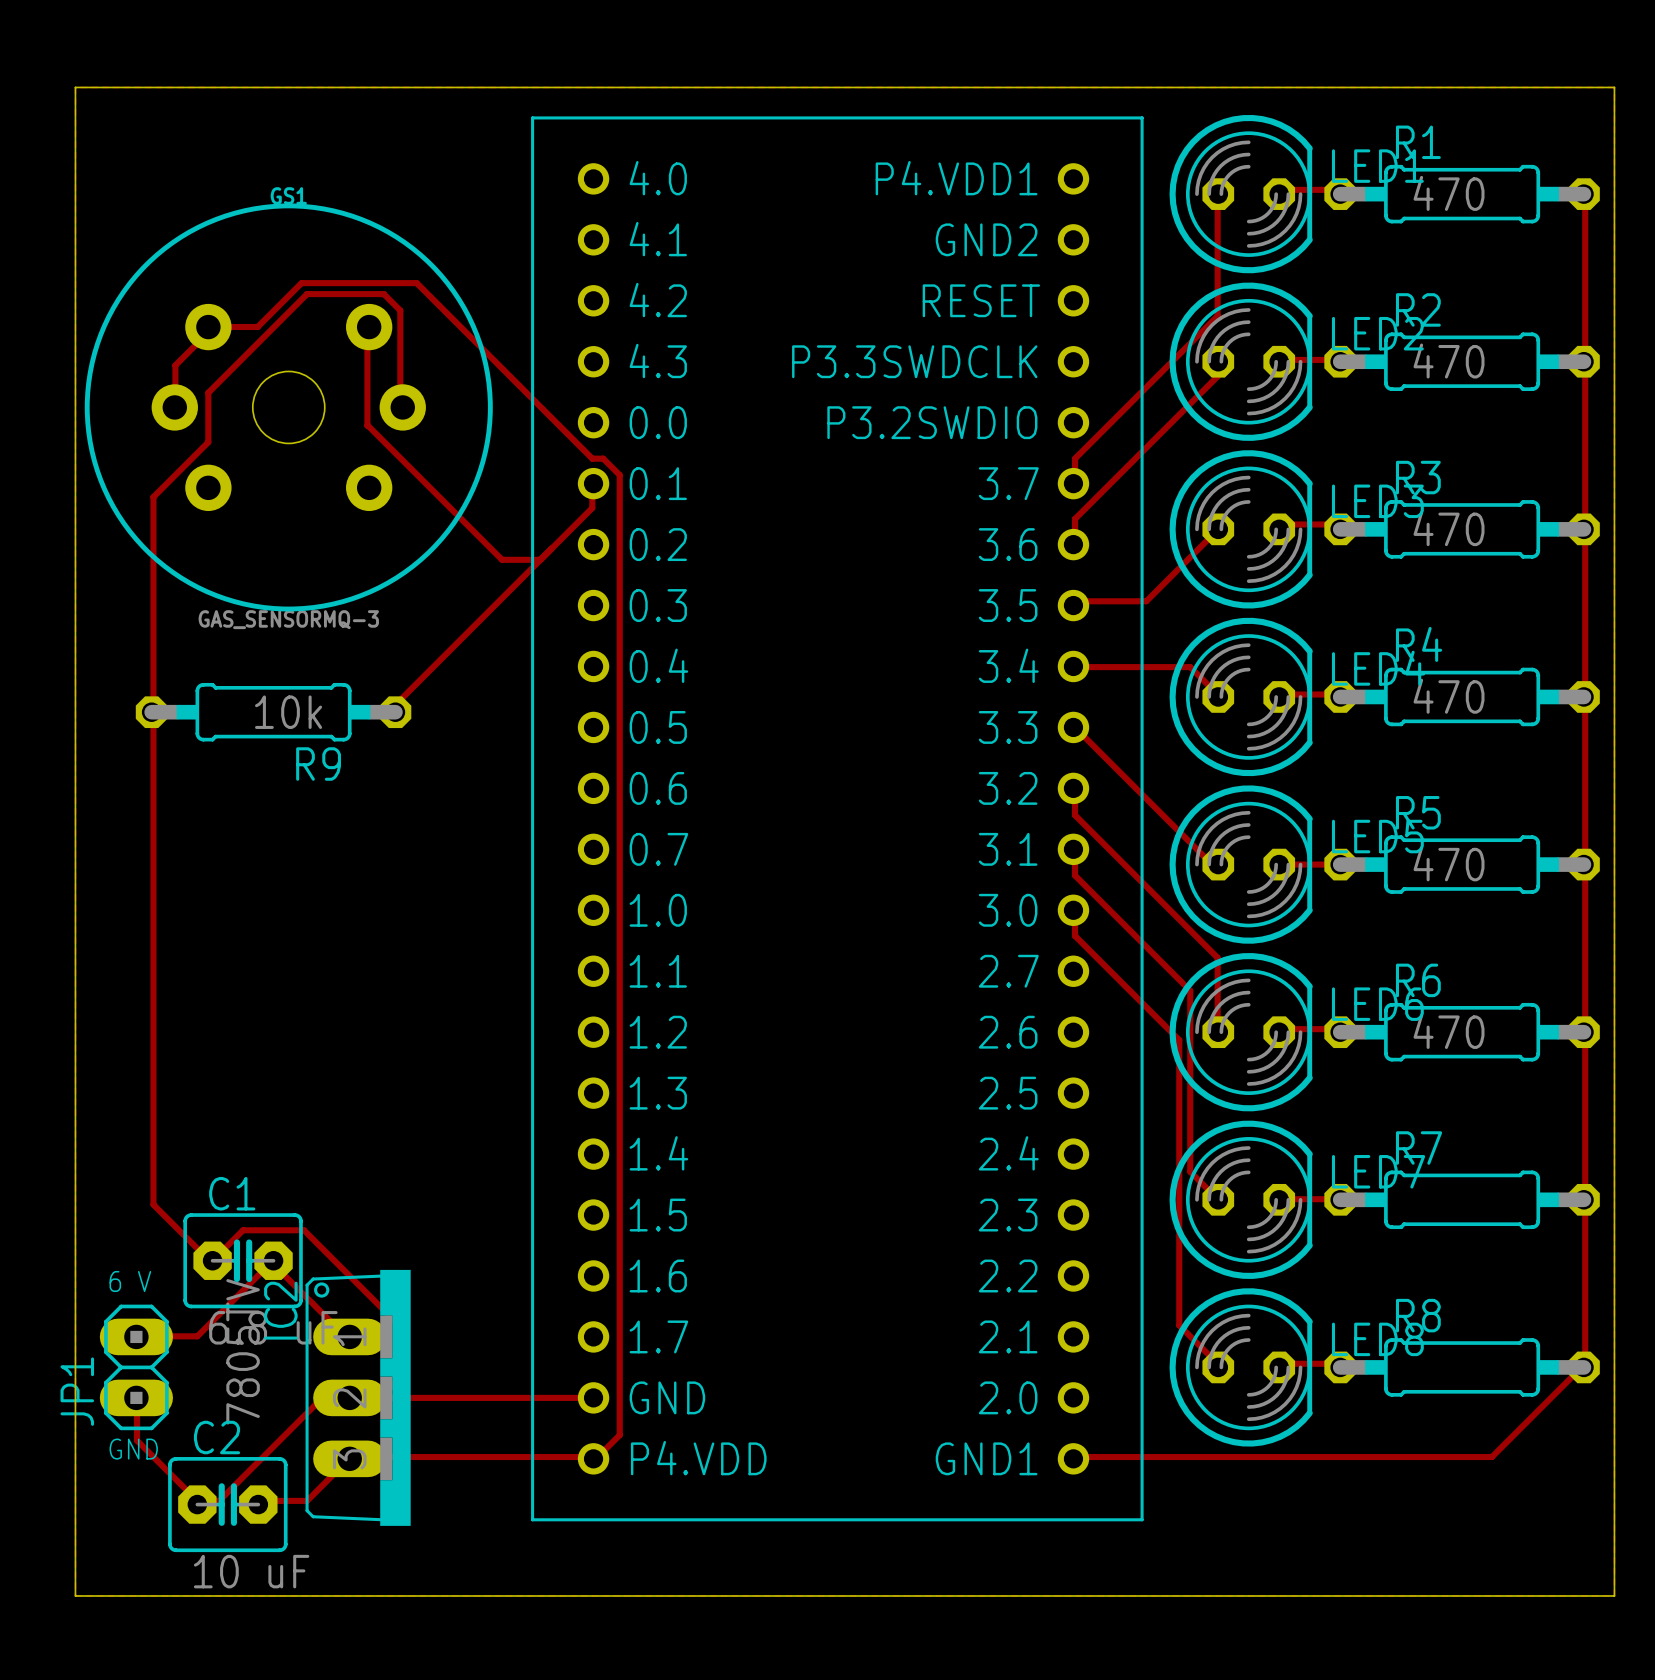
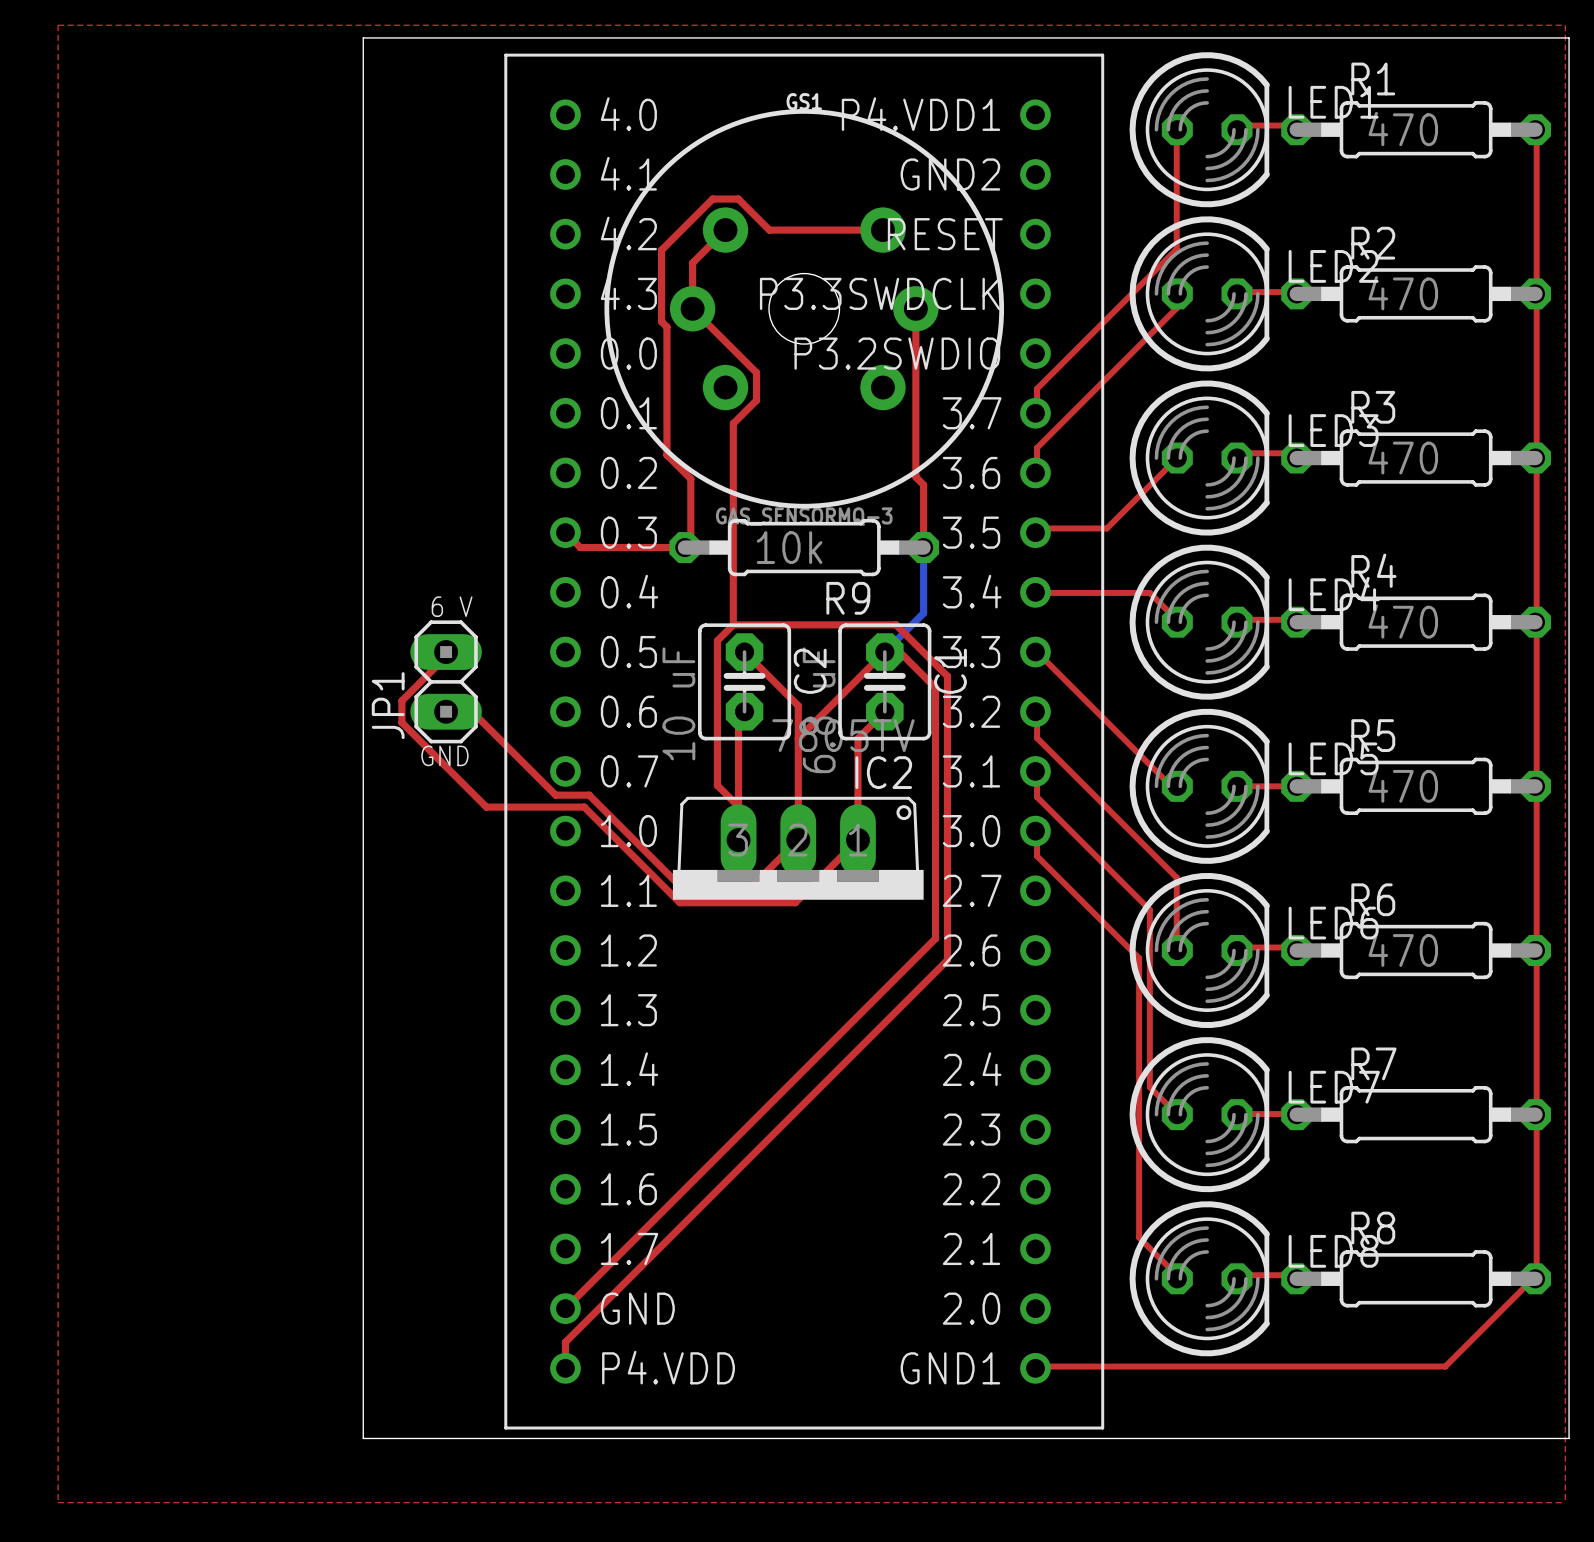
board edge: (75, 87) (1614, 87) (1614, 1595) (75, 1595) (75, 87) -> (363, 37) (363, 1438) (1569, 1438) (1569, 37) (363, 37)
top track: none -> (725, 230) (692, 262) (692, 308) (756, 372) (756, 400) (733, 423) (733, 624)
top track: none -> (882, 230) (769, 230) (738, 199) (712, 199) (661, 250) (661, 321) (666, 327) (666, 455) (690, 478) (690, 541) (684, 547) (580, 547) (565, 532)
top track: (369, 327) (367, 332) (367, 425) (502, 559) (540, 559) -> none
top track: none -> (915, 308) (915, 477) (923, 484) (923, 547)
top track: (174, 407) (175, 365) (208, 332) (208, 327) (257, 326) (301, 283) (416, 283) (592, 458) (603, 458) (619, 475) (619, 1435) (597, 1457) (593, 1458) (592, 1457) (350, 1457) (307, 1500) (263, 1500) (258, 1504) -> none
GS1 position: (288, 407) -> (804, 308)
top track: (402, 407) (400, 403) (400, 310) (383, 294) (307, 294) (208, 392) (208, 442) (153, 497) (153, 710) (151, 712) (153, 716) (153, 1204) (208, 1259) (212, 1260) (243, 1230) (304, 1230) (395, 1321) (395, 1382) (380, 1397) -> none
top track: (593, 483) (592, 508) (400, 700) (400, 710) (395, 712) -> none
bottom track: none -> (923, 547) (923, 613) (884, 652)
text: none -> 6 V (452, 606)
top track: none -> (733, 624) (717, 640) (717, 785) (738, 806)
top track: none -> (733, 624) (896, 624) (947, 676) (947, 960) (565, 1342) (565, 1368)
R9 position: (273, 712) -> (804, 547)
R9 value position: 10k (288, 712) -> 10k (789, 547)
top track: none -> (446, 652) (446, 656) (401, 700) (401, 722) (486, 807) (584, 807) (679, 902) (795, 902) (857, 840) (857, 738) (884, 711)
top track: none -> (744, 652) (798, 705) (798, 840) (747, 890) (684, 890) (589, 795) (555, 795) (472, 711) (446, 711)
top track: none -> (744, 711) (738, 717) (738, 840)
text: none -> GND (444, 755)
C1 rotation: 0° (243, 1260) -> 90° clockwise (884, 681)
C1 position: (243, 1260) -> (884, 681)
text: 6 V (130, 1281) -> none
top track: (136, 1336) (197, 1336) (273, 1260) (274, 1265) (345, 1336) (349, 1336) -> none
JP1 position: (136, 1367) -> (446, 681)
top track: (136, 1397) (137, 1440) (197, 1500) -> none
IC2 rotation: 0° (358, 1397) -> 90° clockwise (798, 848)
IC2 position: (358, 1397) -> (798, 848)
top track: (593, 1397) (349, 1397) (345, 1402) (318, 1402) (219, 1500) (197, 1500) -> (565, 1308) (935, 938) (935, 687) (899, 652) (884, 652) (798, 738)
text: GND (133, 1449) -> none
C2 rotation: 0° (227, 1504) -> 90° clockwise (744, 681)
C2 position: (227, 1504) -> (744, 681)

